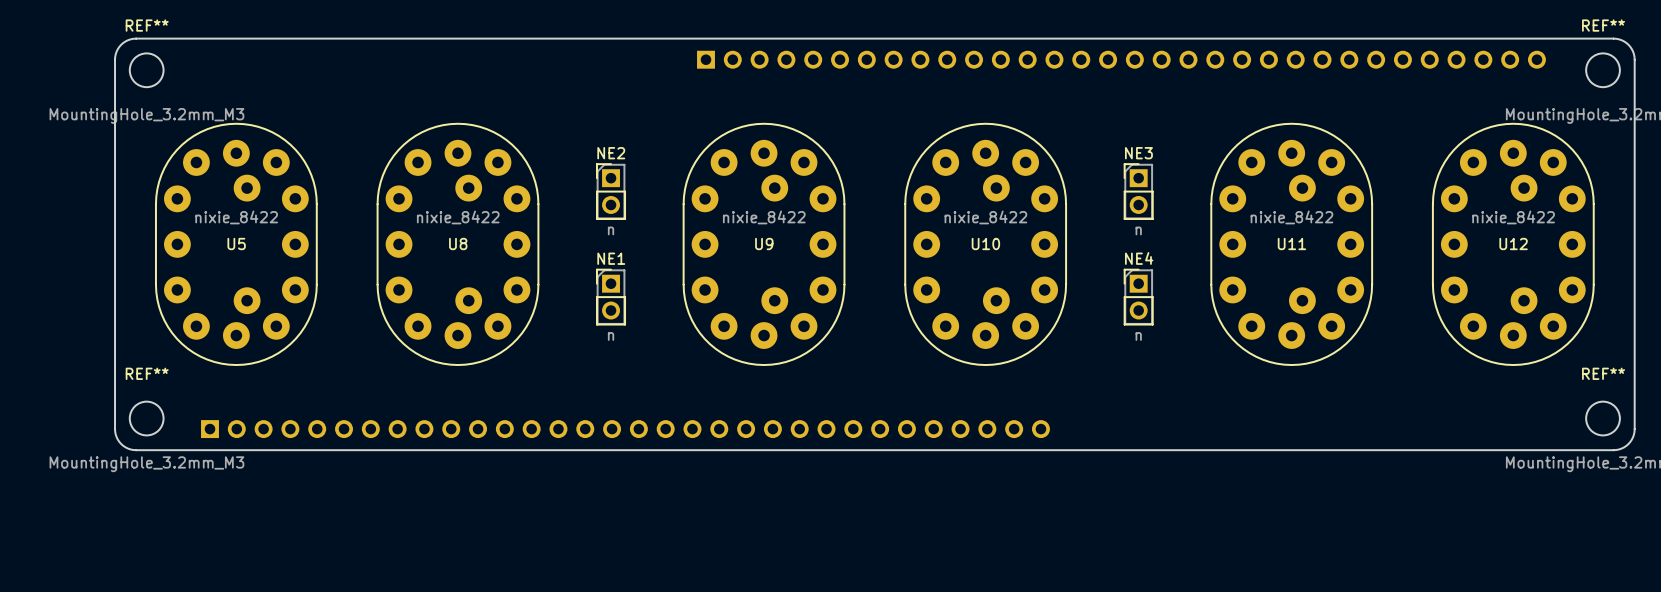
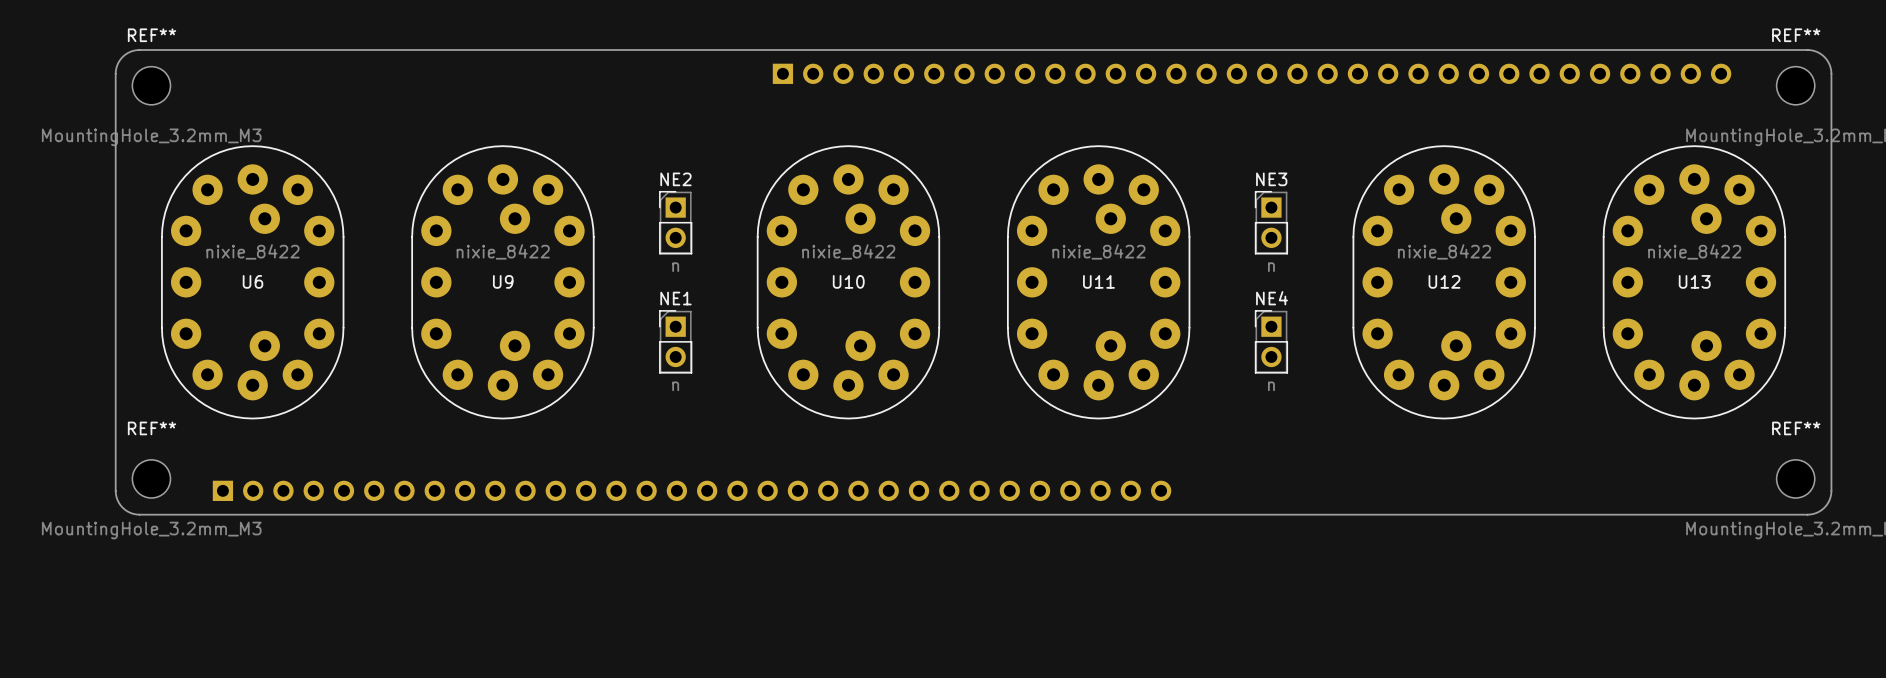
U5 name: U5 (236, 244) -> U6 (252, 281)
U8 name: U8 (458, 244) -> U9 (503, 281)
U9 name: U9 (764, 244) -> U10 (848, 281)
U10 name: U10 (985, 244) -> U11 (1098, 281)
U11 name: U11 (1291, 244) -> U12 (1444, 281)
U12 name: U12 (1513, 244) -> U13 (1694, 281)

